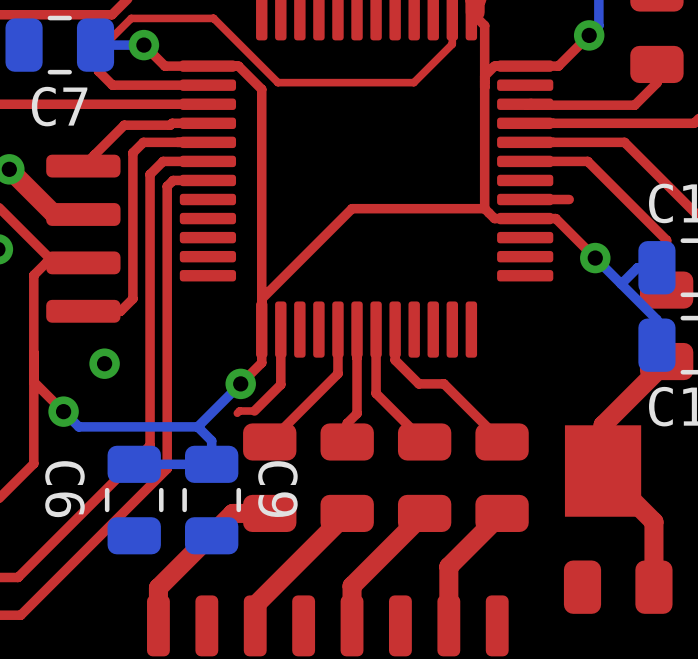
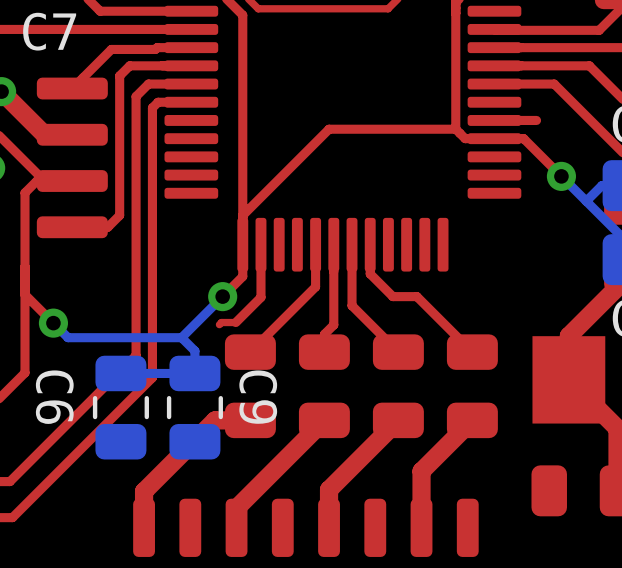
via: (104, 363) -> none

